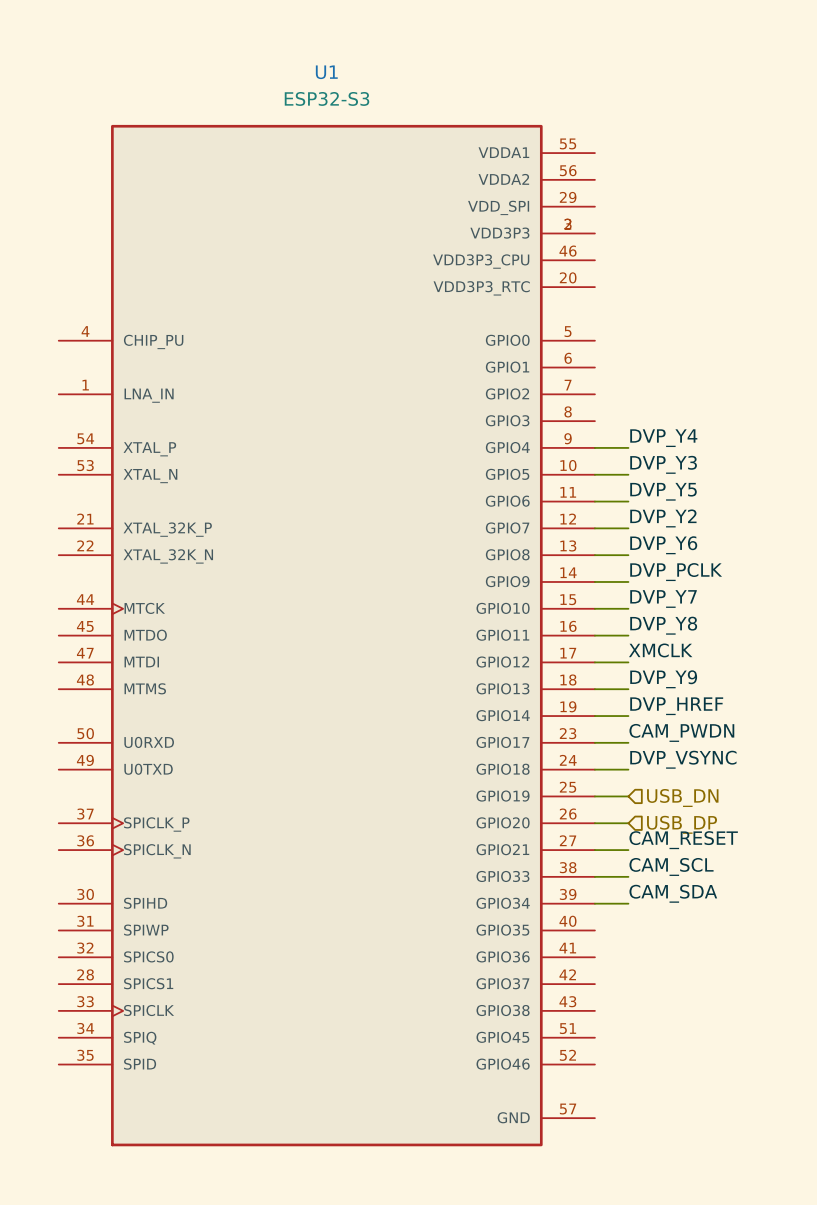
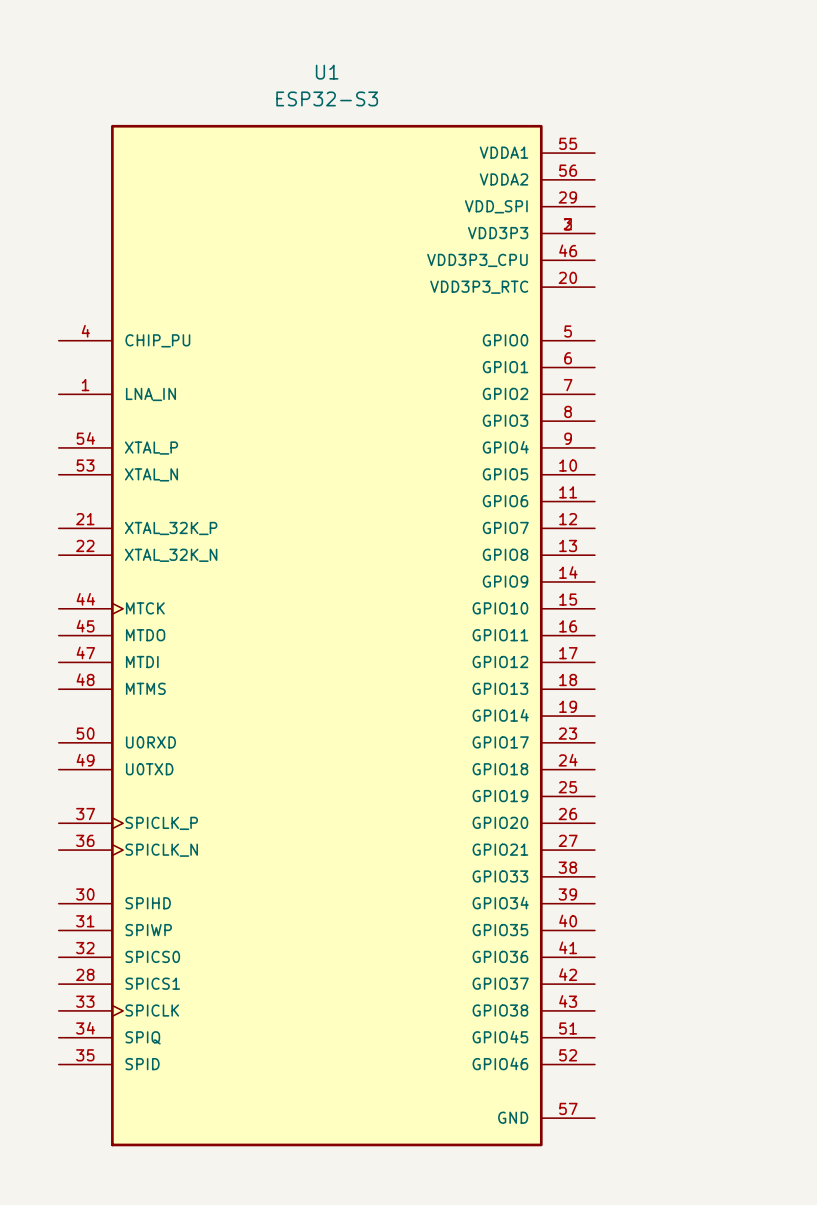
label: DVP_Y4 (663, 438) -> none
wire: (594, 447) (628, 447) -> none
label: DVP_Y3 (663, 464) -> none
wire: (594, 474) (628, 474) -> none
label: DVP_Y5 (663, 491) -> none
wire: (594, 501) (628, 501) -> none
label: DVP_Y2 (663, 518) -> none
wire: (594, 528) (628, 528) -> none
label: DVP_Y6 (663, 545) -> none
wire: (594, 555) (628, 555) -> none
label: DVP_PCLK (676, 572) -> none
wire: (594, 581) (628, 581) -> none
label: DVP_Y7 (663, 599) -> none
wire: (594, 608) (628, 608) -> none
label: DVP_Y8 (663, 625) -> none
wire: (594, 635) (628, 635) -> none
label: XMCLK (660, 650) -> none
wire: (594, 662) (628, 662) -> none
label: DVP_Y9 (663, 679) -> none
wire: (594, 689) (628, 689) -> none
label: DVP_HREF (676, 706) -> none
wire: (594, 716) (628, 716) -> none
label: CAM_PWDN (681, 732) -> none
wire: (594, 742) (628, 742) -> none
label: DVP_VSYNC (683, 759) -> none
wire: (594, 769) (628, 769) -> none
wire: (594, 796) (628, 796) -> none
hierarchical label: USB_DN (682, 797) -> none
wire: (594, 823) (628, 823) -> none
hierarchical label: USB_DP (682, 824) -> none
label: CAM_RESET (683, 840) -> none
wire: (594, 850) (628, 850) -> none
label: CAM_SCL (671, 866) -> none
wire: (594, 876) (628, 876) -> none
label: CAM_SDA (673, 893) -> none
wire: (594, 903) (628, 903) -> none

